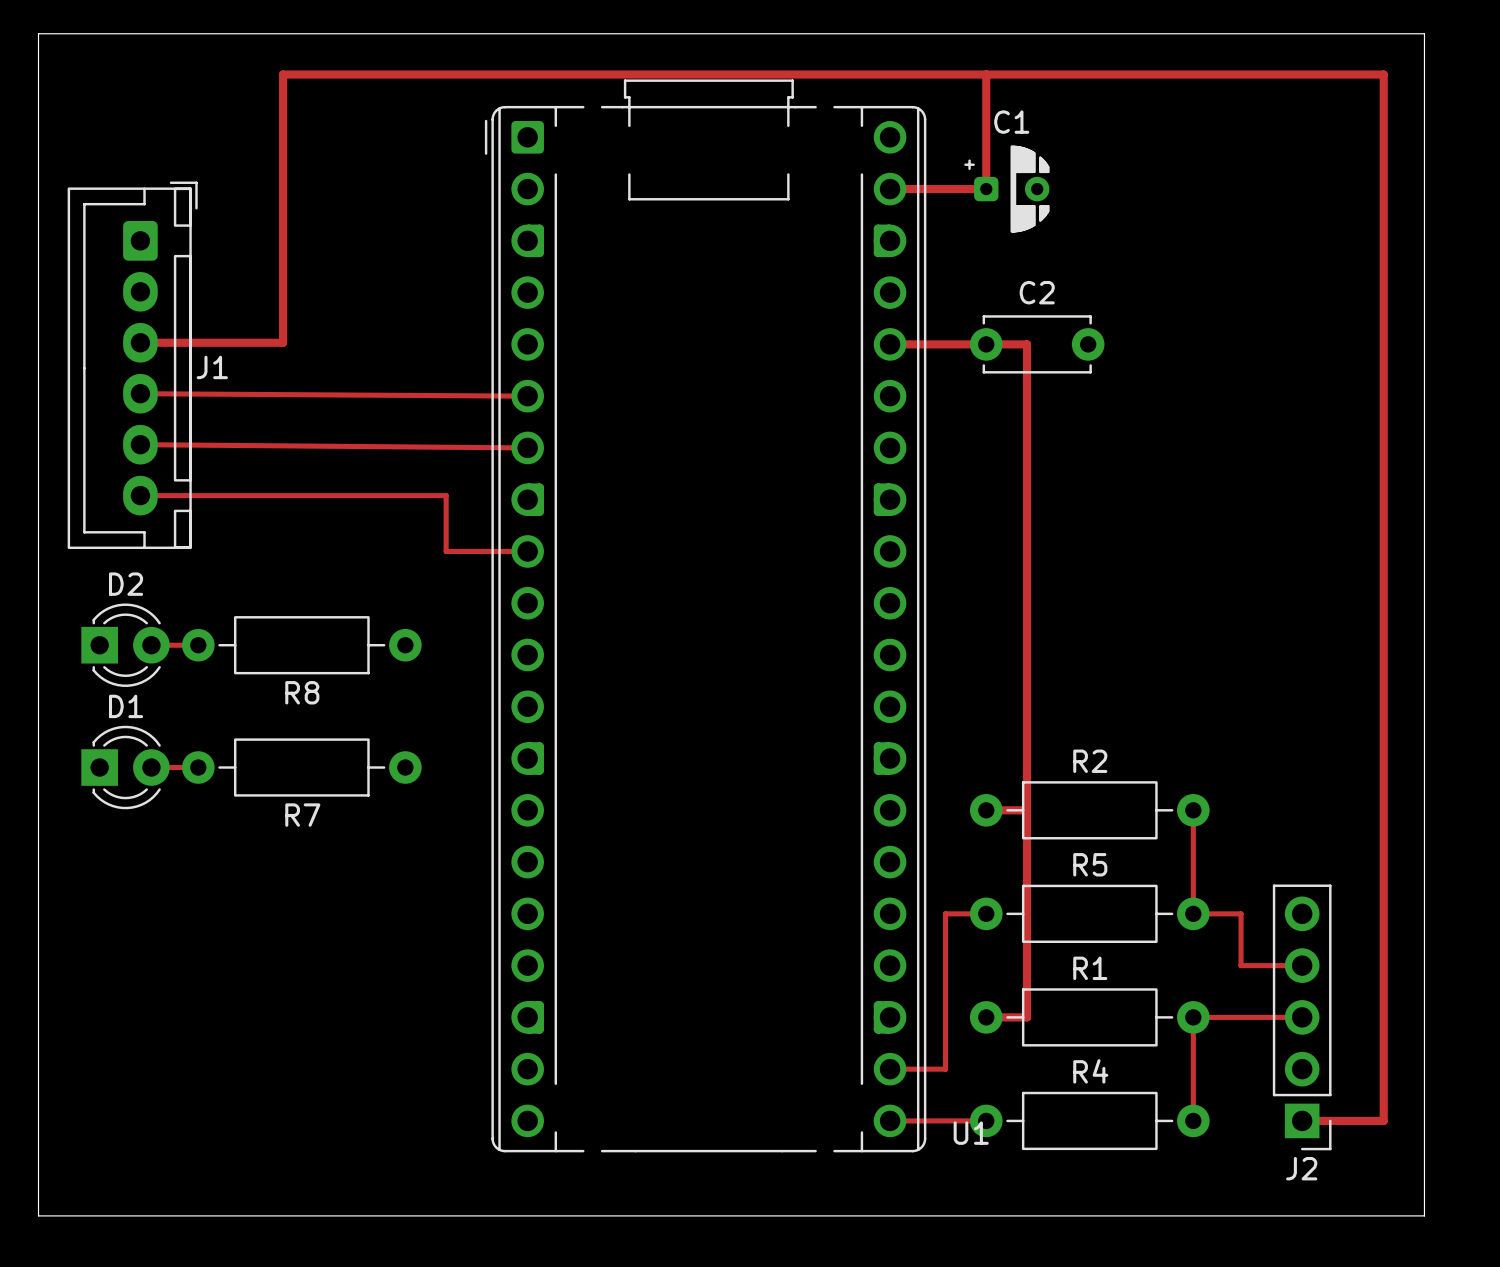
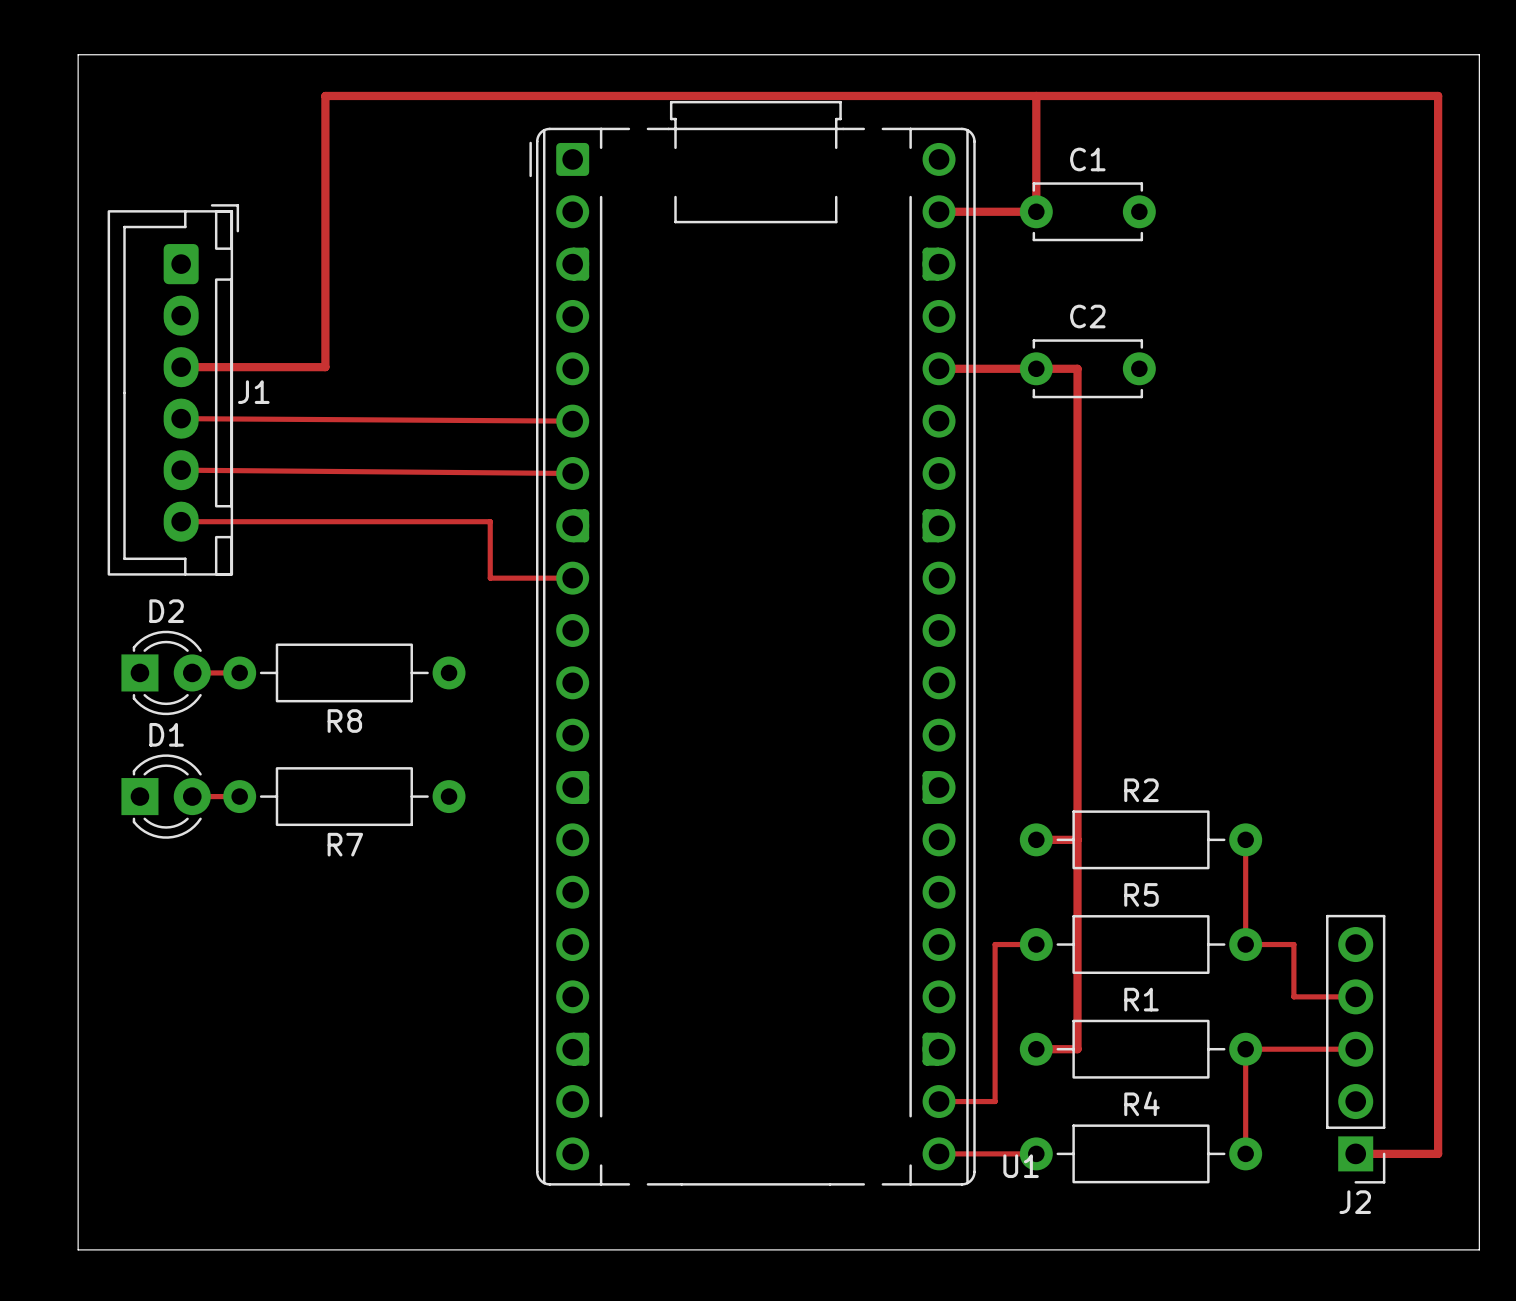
C1 footprint: [964, 145, 1050, 233] -> [1019, 182, 1156, 242]

